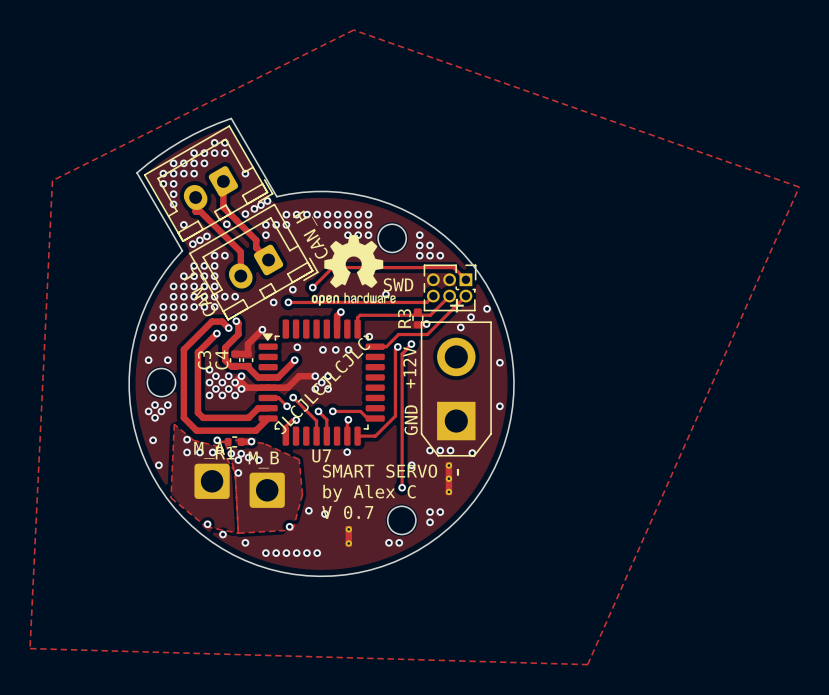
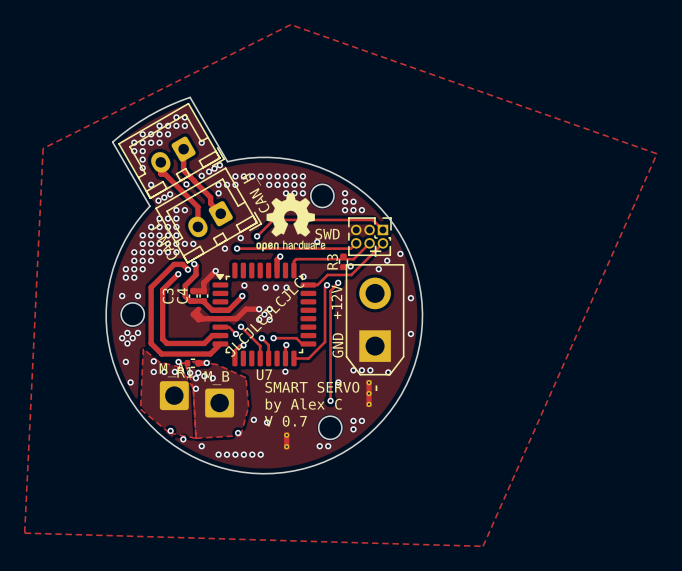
via: (209, 369) -> none
via: (215, 376) -> none
via: (228, 376) -> none
via: (241, 376) -> none
via: (209, 382) -> none
via: (222, 382) -> none
via: (235, 382) -> none
via: (215, 389) -> none
via: (228, 389) -> none
via: (241, 389) -> none
via: (209, 395) -> none
via: (222, 395) -> none
via: (235, 395) -> none

